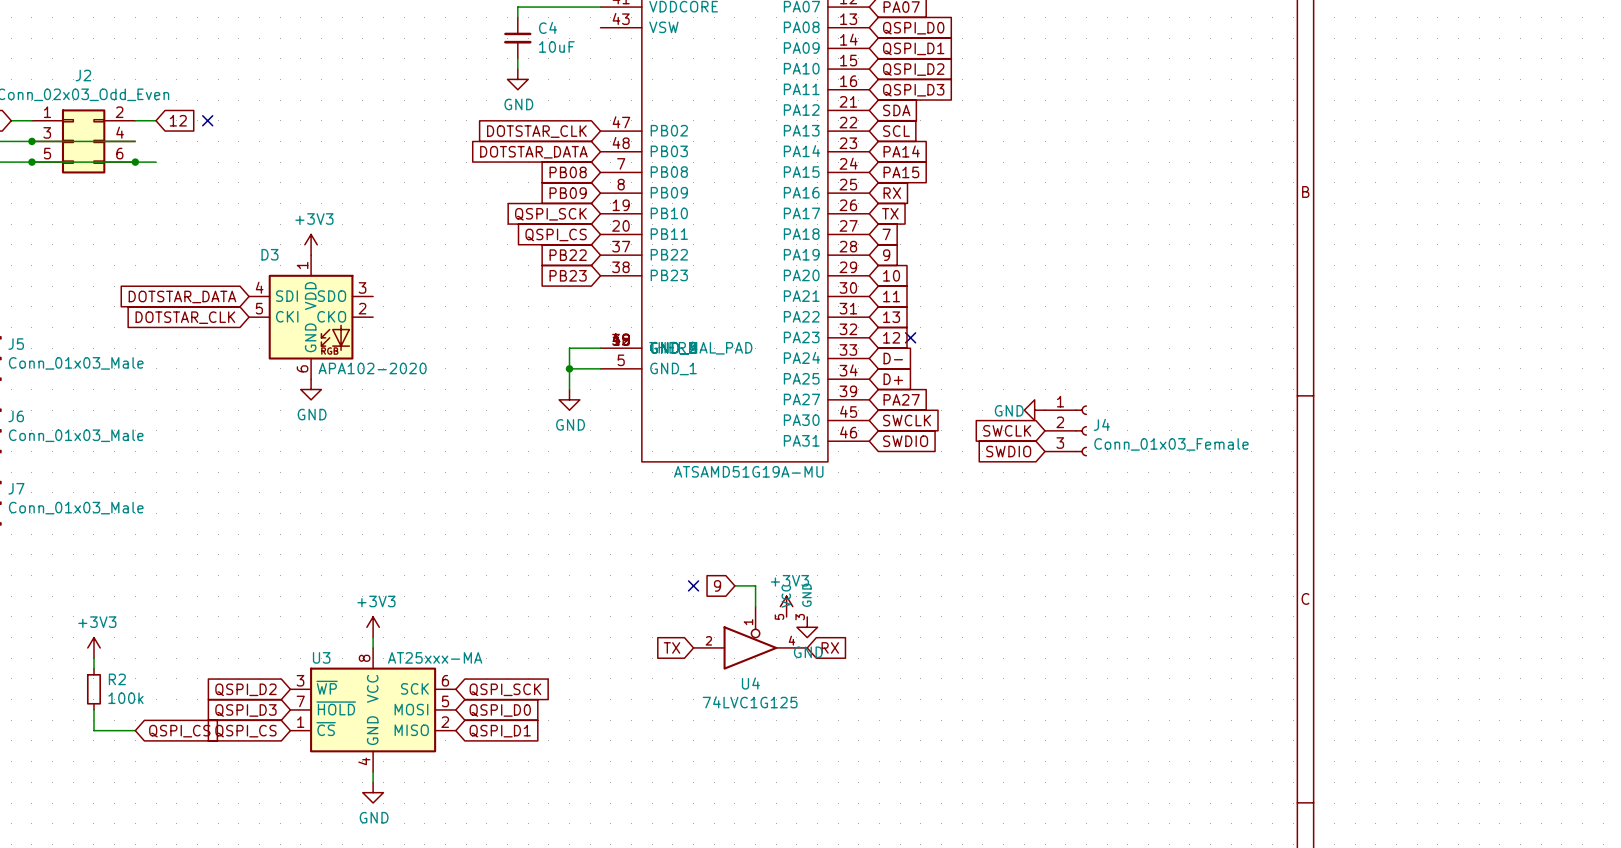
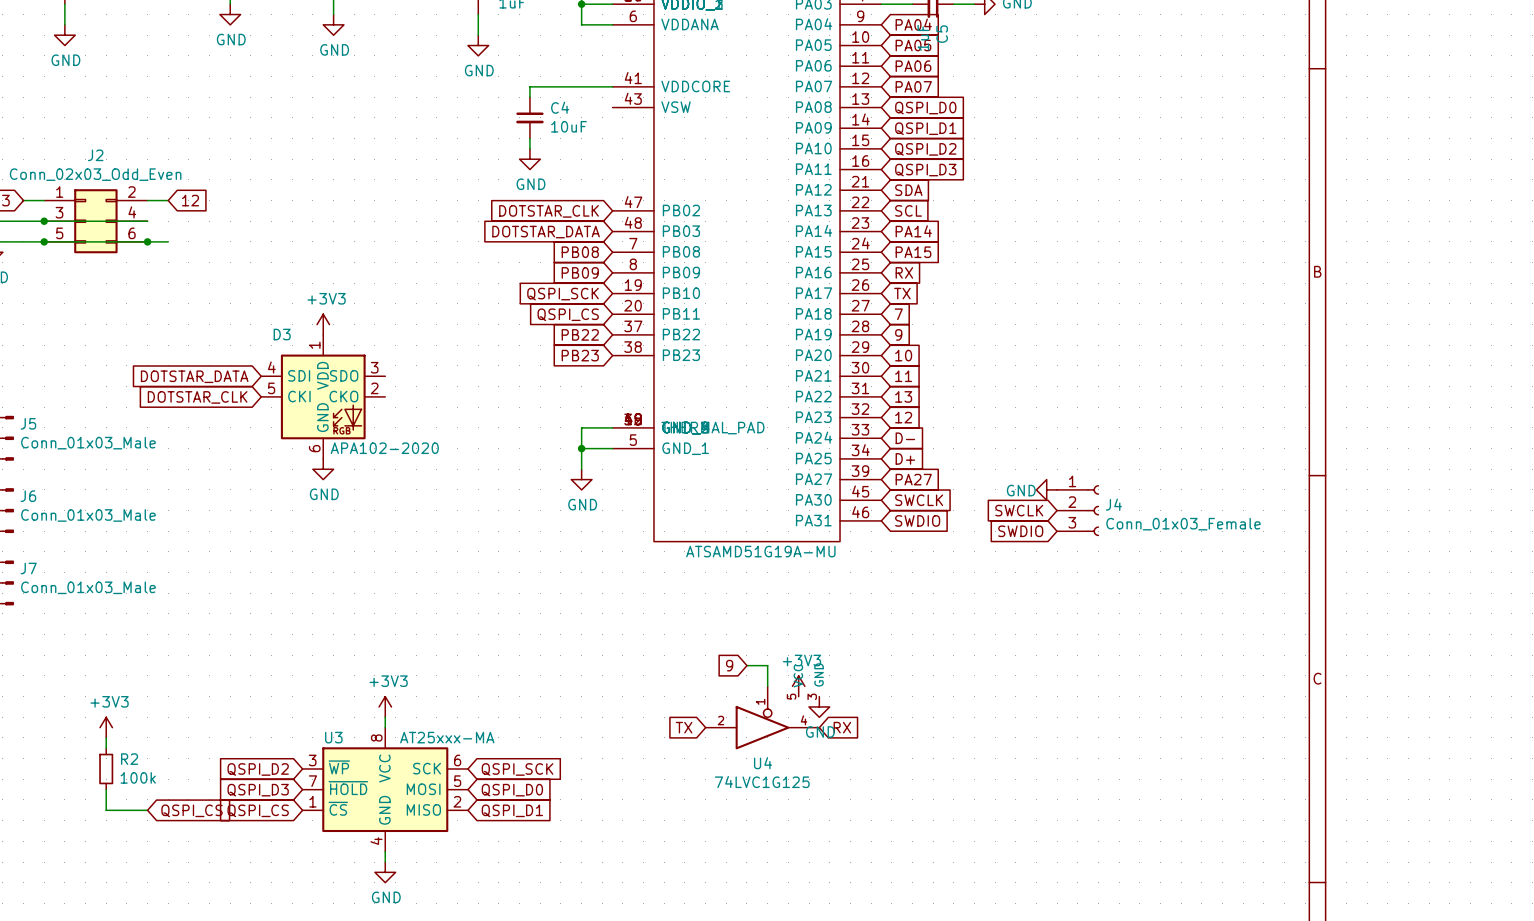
no-connect mark: (207, 120) -> none
no-connect mark: (910, 337) -> none
no-connect mark: (693, 585) -> none

